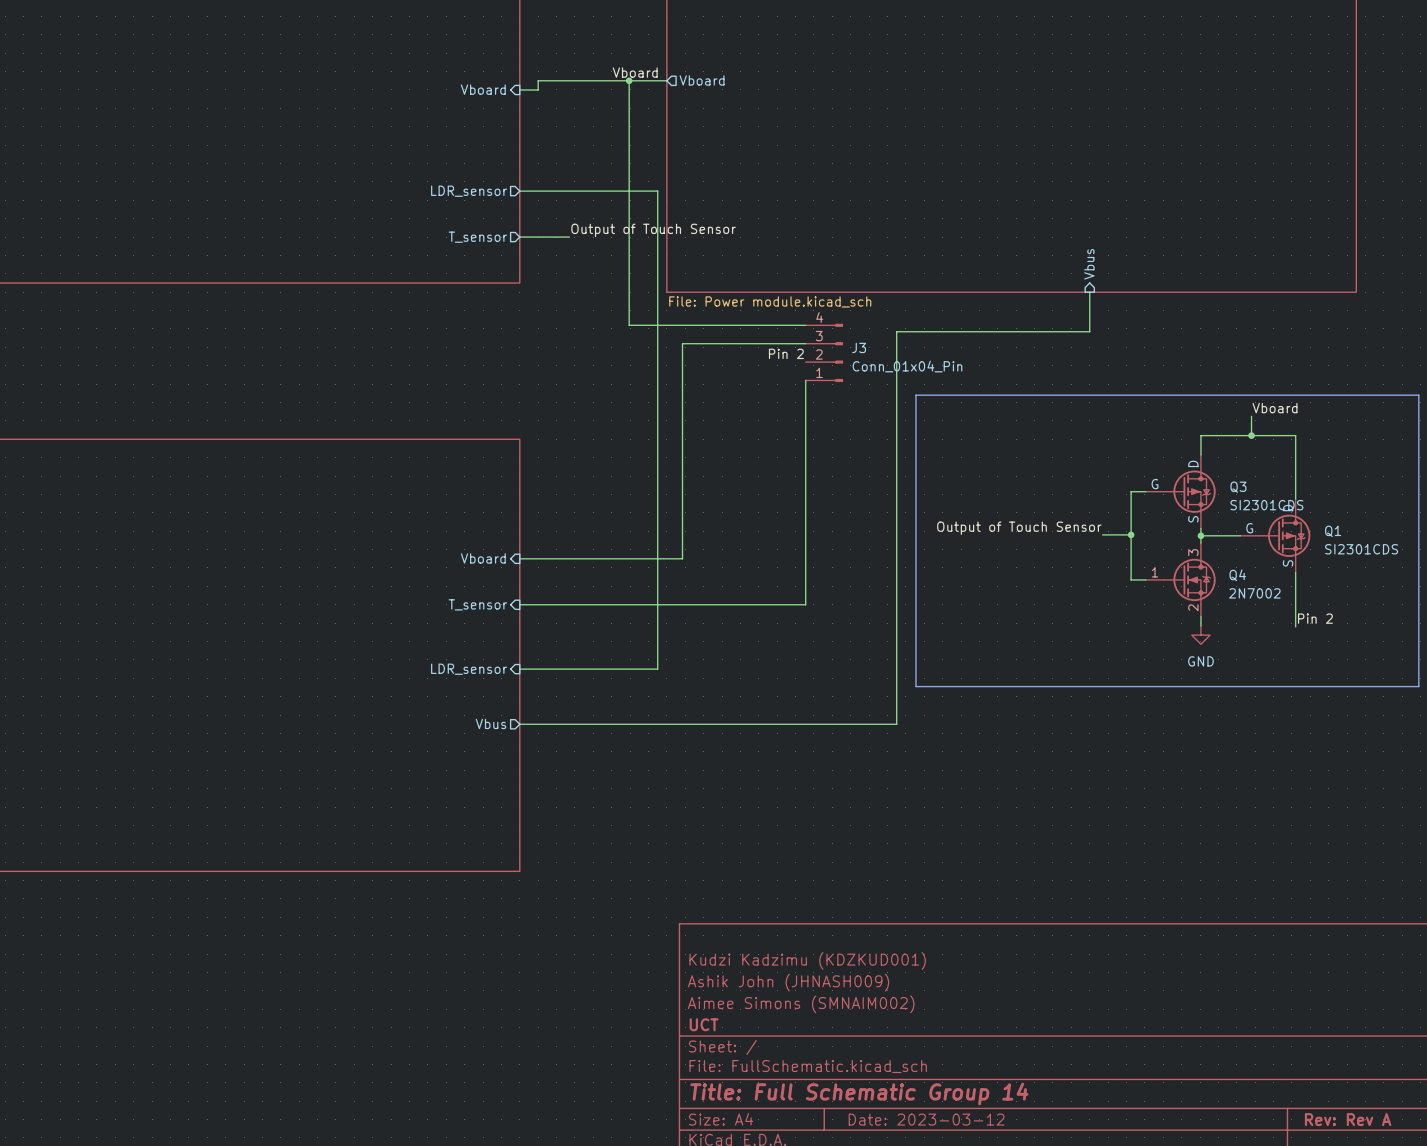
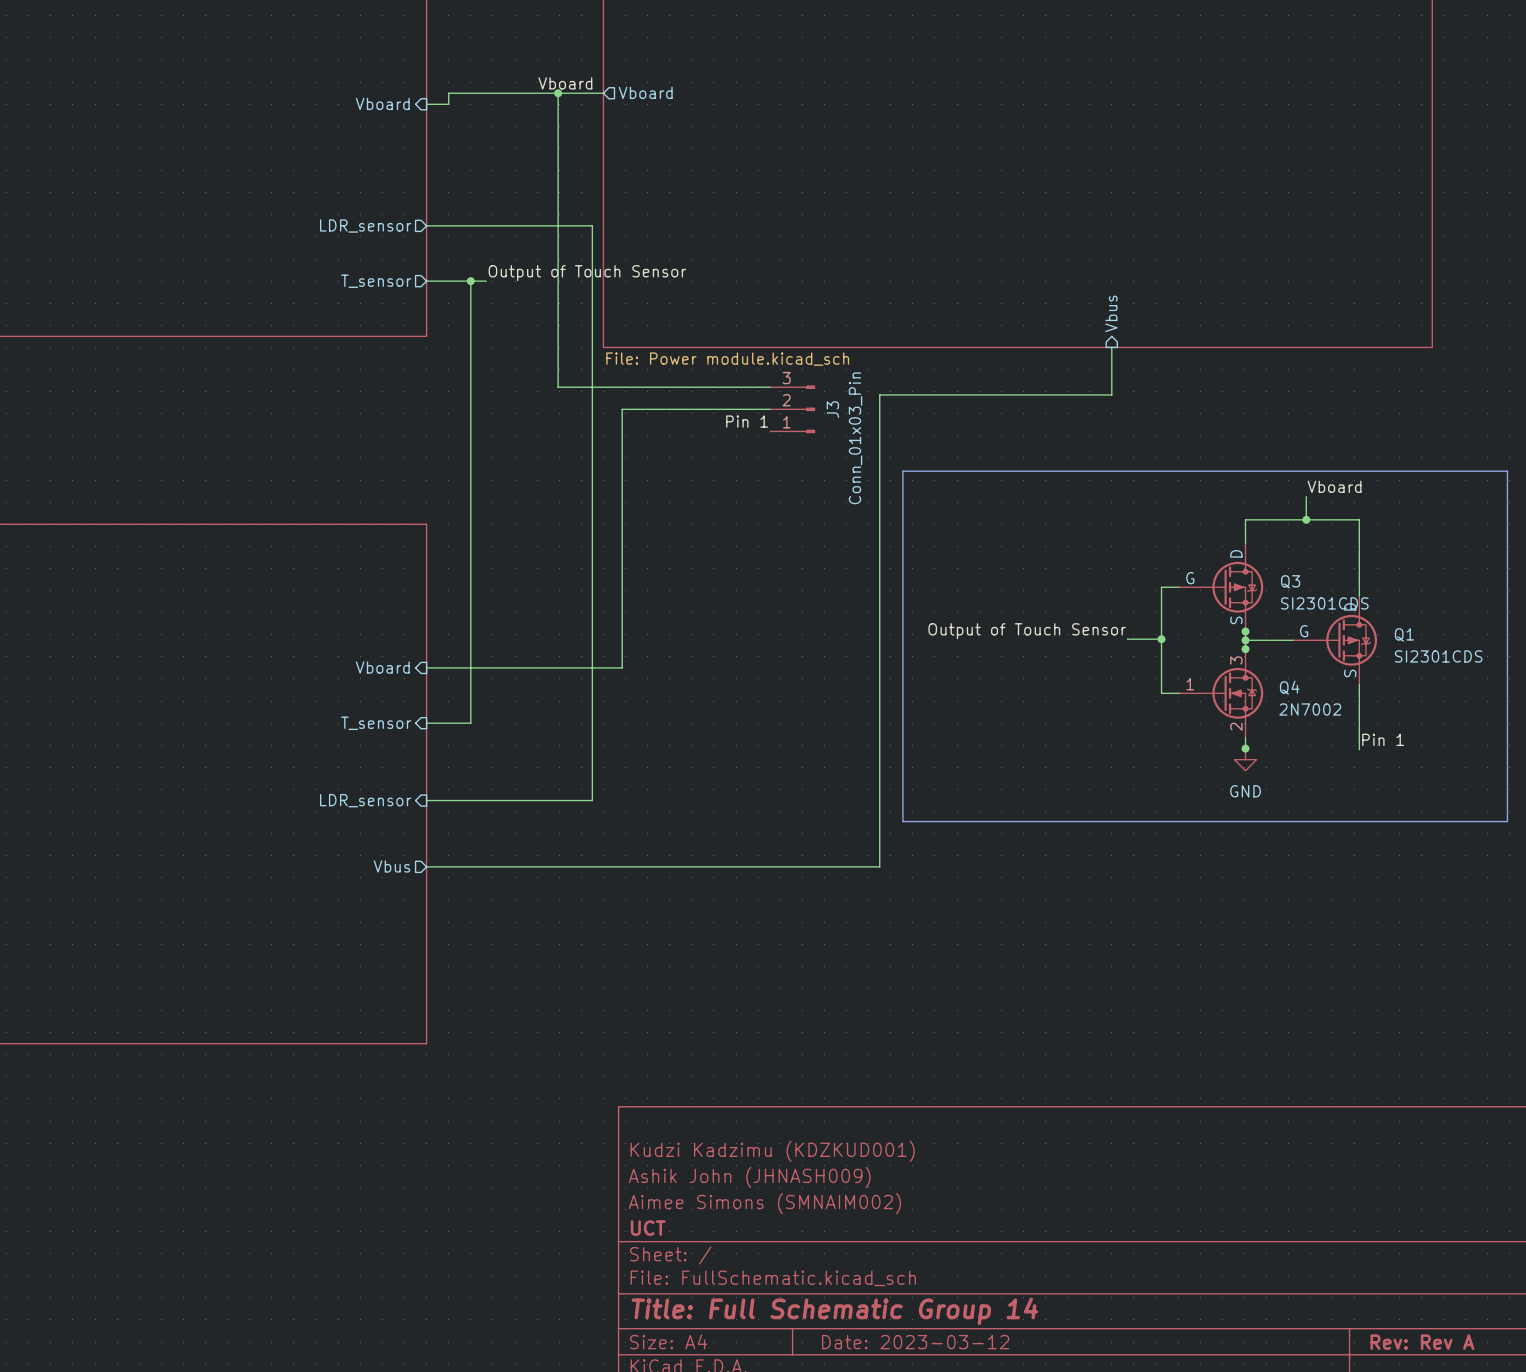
junction: none -> (470, 281)
J3 symbol: [805, 323, 844, 382] -> [770, 385, 816, 434]
label: Pin 2 (786, 353) -> Pin 1 (747, 421)
J3 value: Conn_01x04_Pin (907, 366) -> Conn_01x03_Pin (855, 438)
wire: (805, 380) (805, 604) (556, 604) -> (470, 281) (470, 723)
junction: none -> (1245, 631)
junction: none -> (1245, 649)
label: Pin 2 (1315, 618) -> Pin 1 (1383, 739)
junction: none -> (1245, 748)

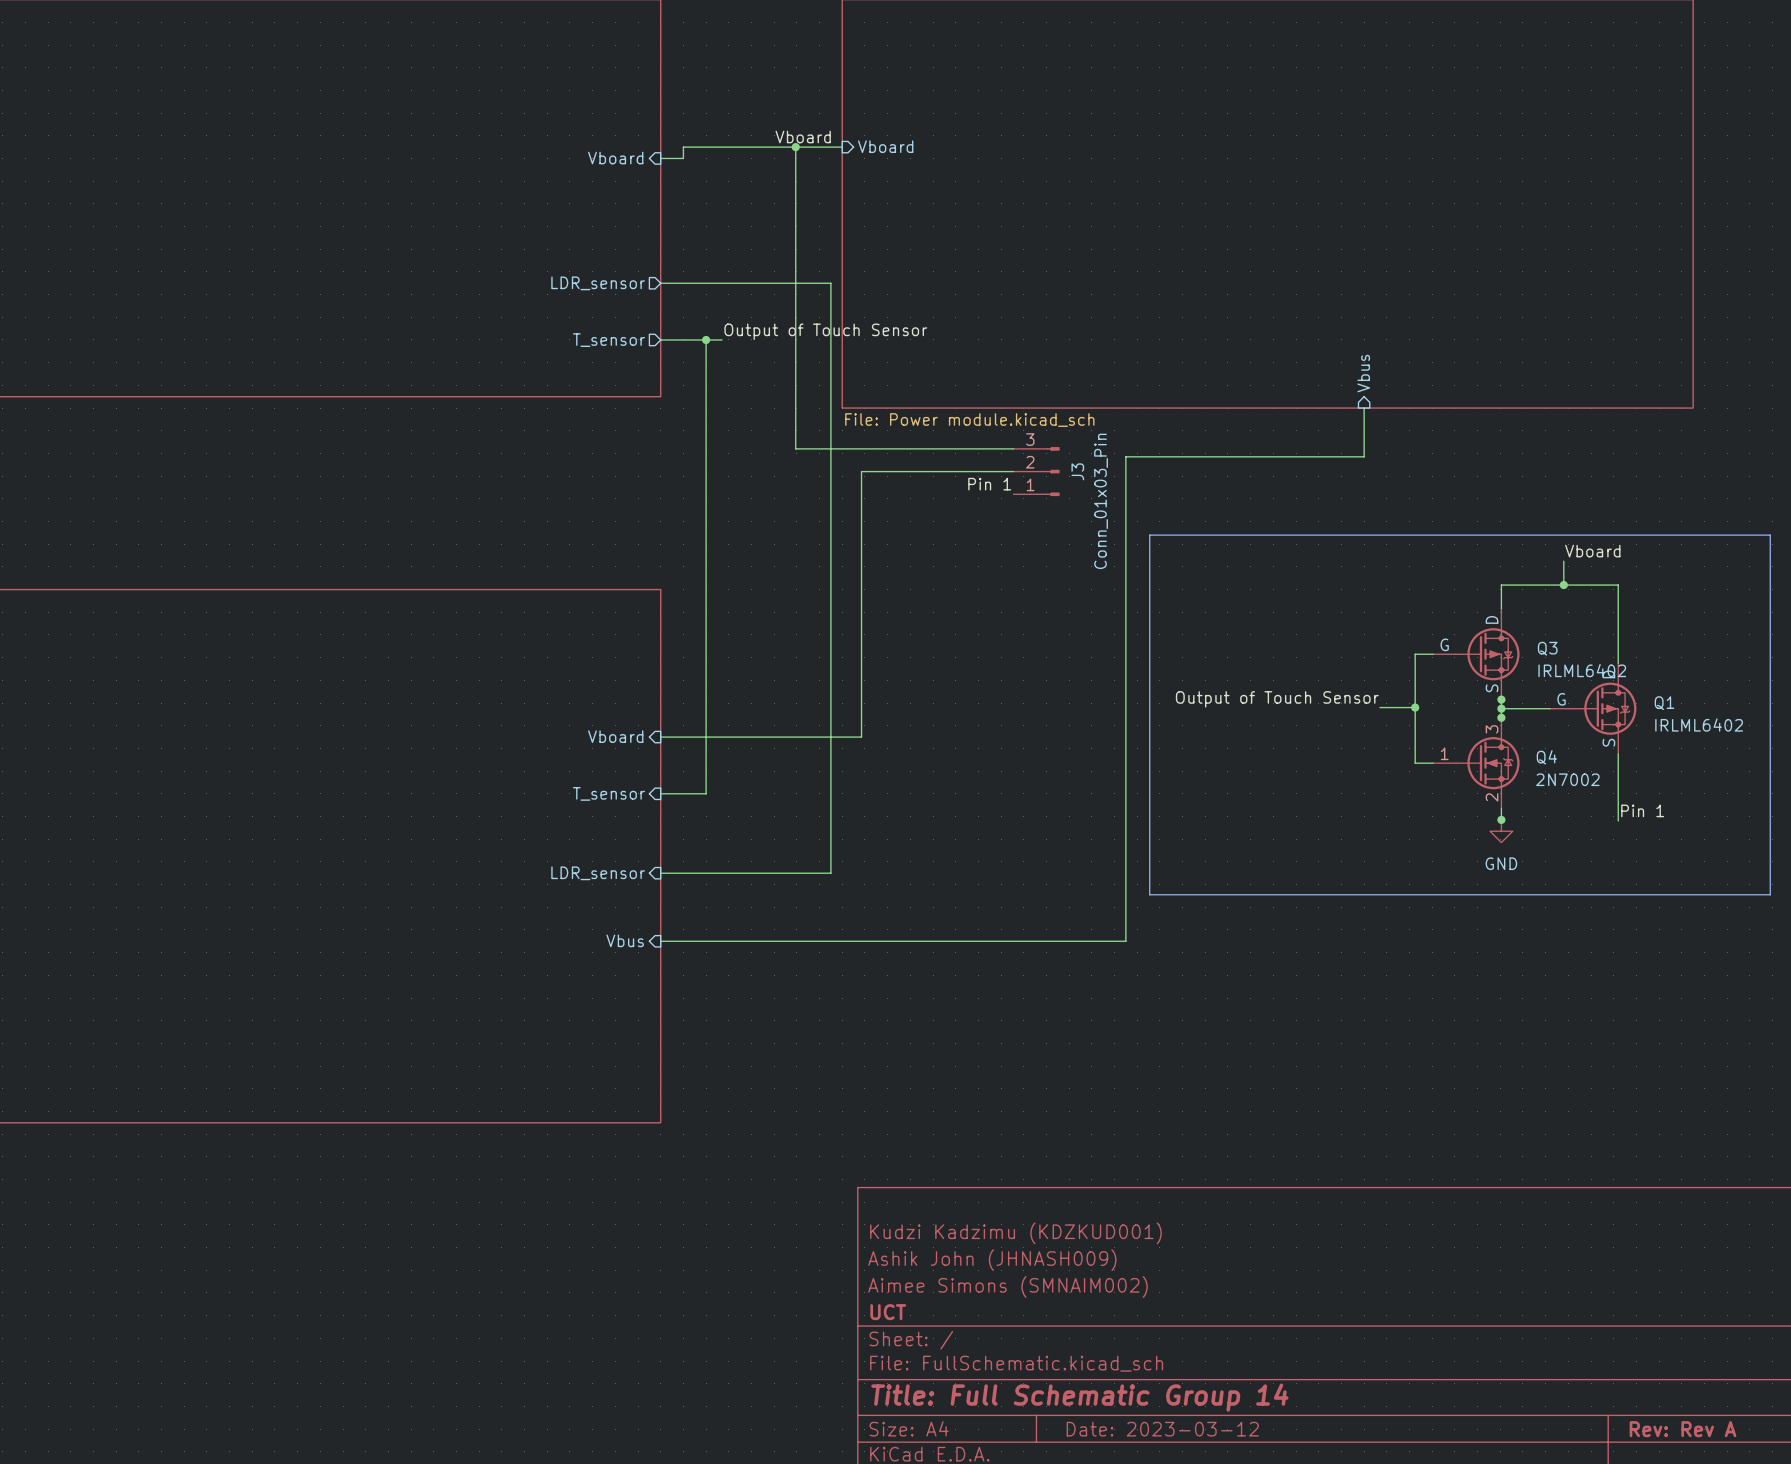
sheet pin shape: output (645, 92) -> input (885, 146)
Q3 value: SI2301CDS (1324, 603) -> IRLML6402 (1582, 670)
Q1 value: SI2301CDS (1438, 656) -> IRLML6402 (1699, 725)
sheet pin shape: output (391, 866) -> input (625, 940)

